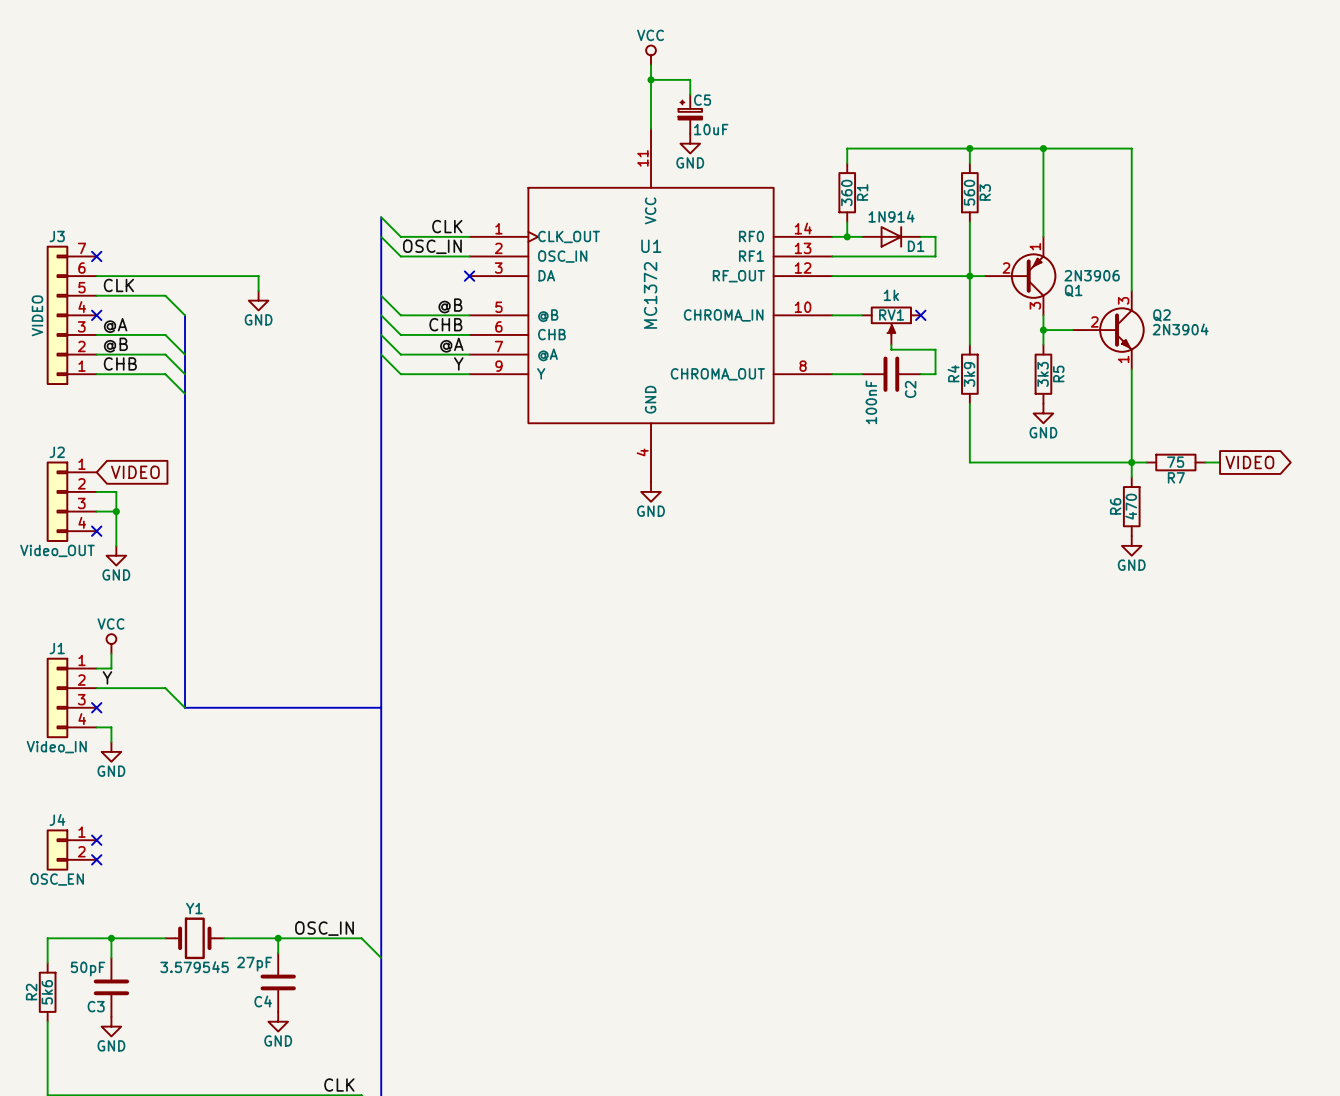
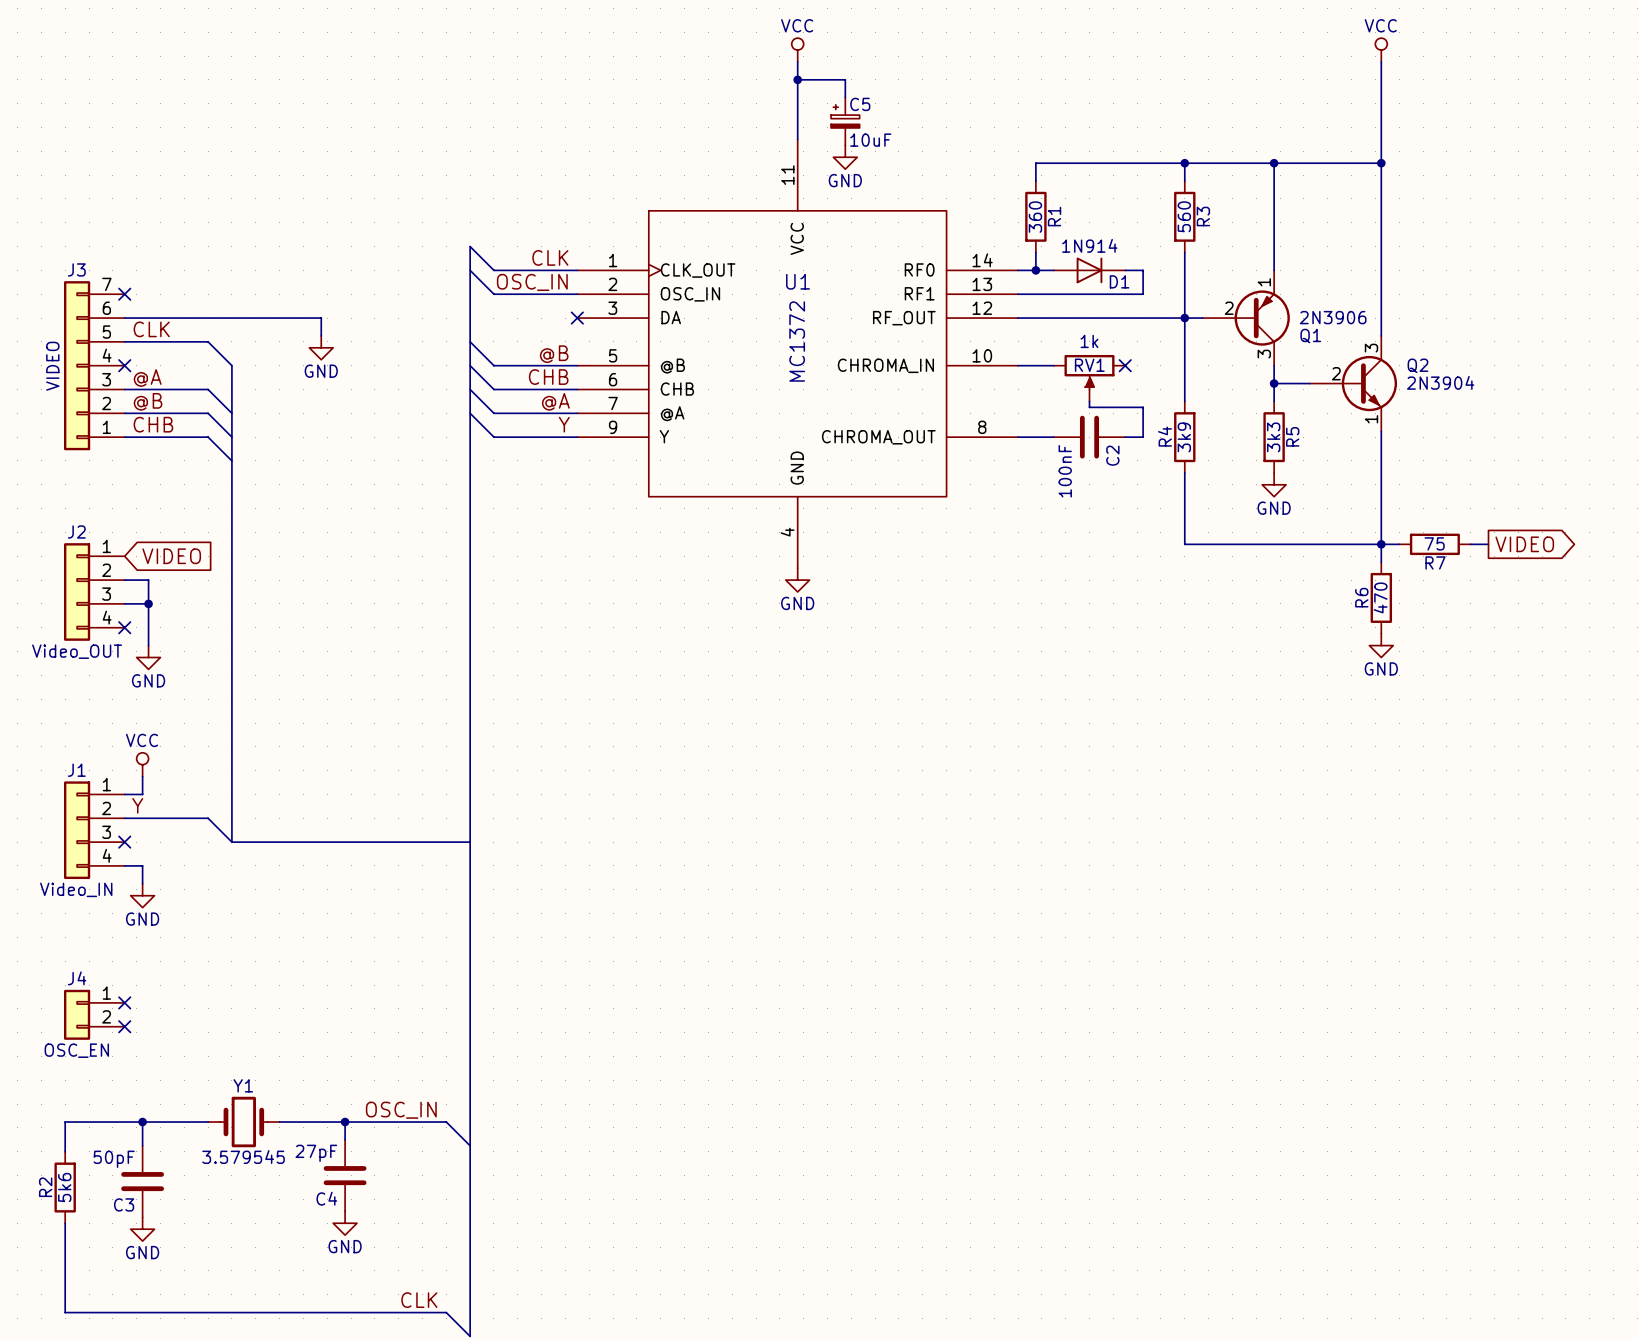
power symbol: none -> VCC (1381, 50)
wire: none -> (1381, 61) (1381, 163)
junction: none -> (1381, 163)

